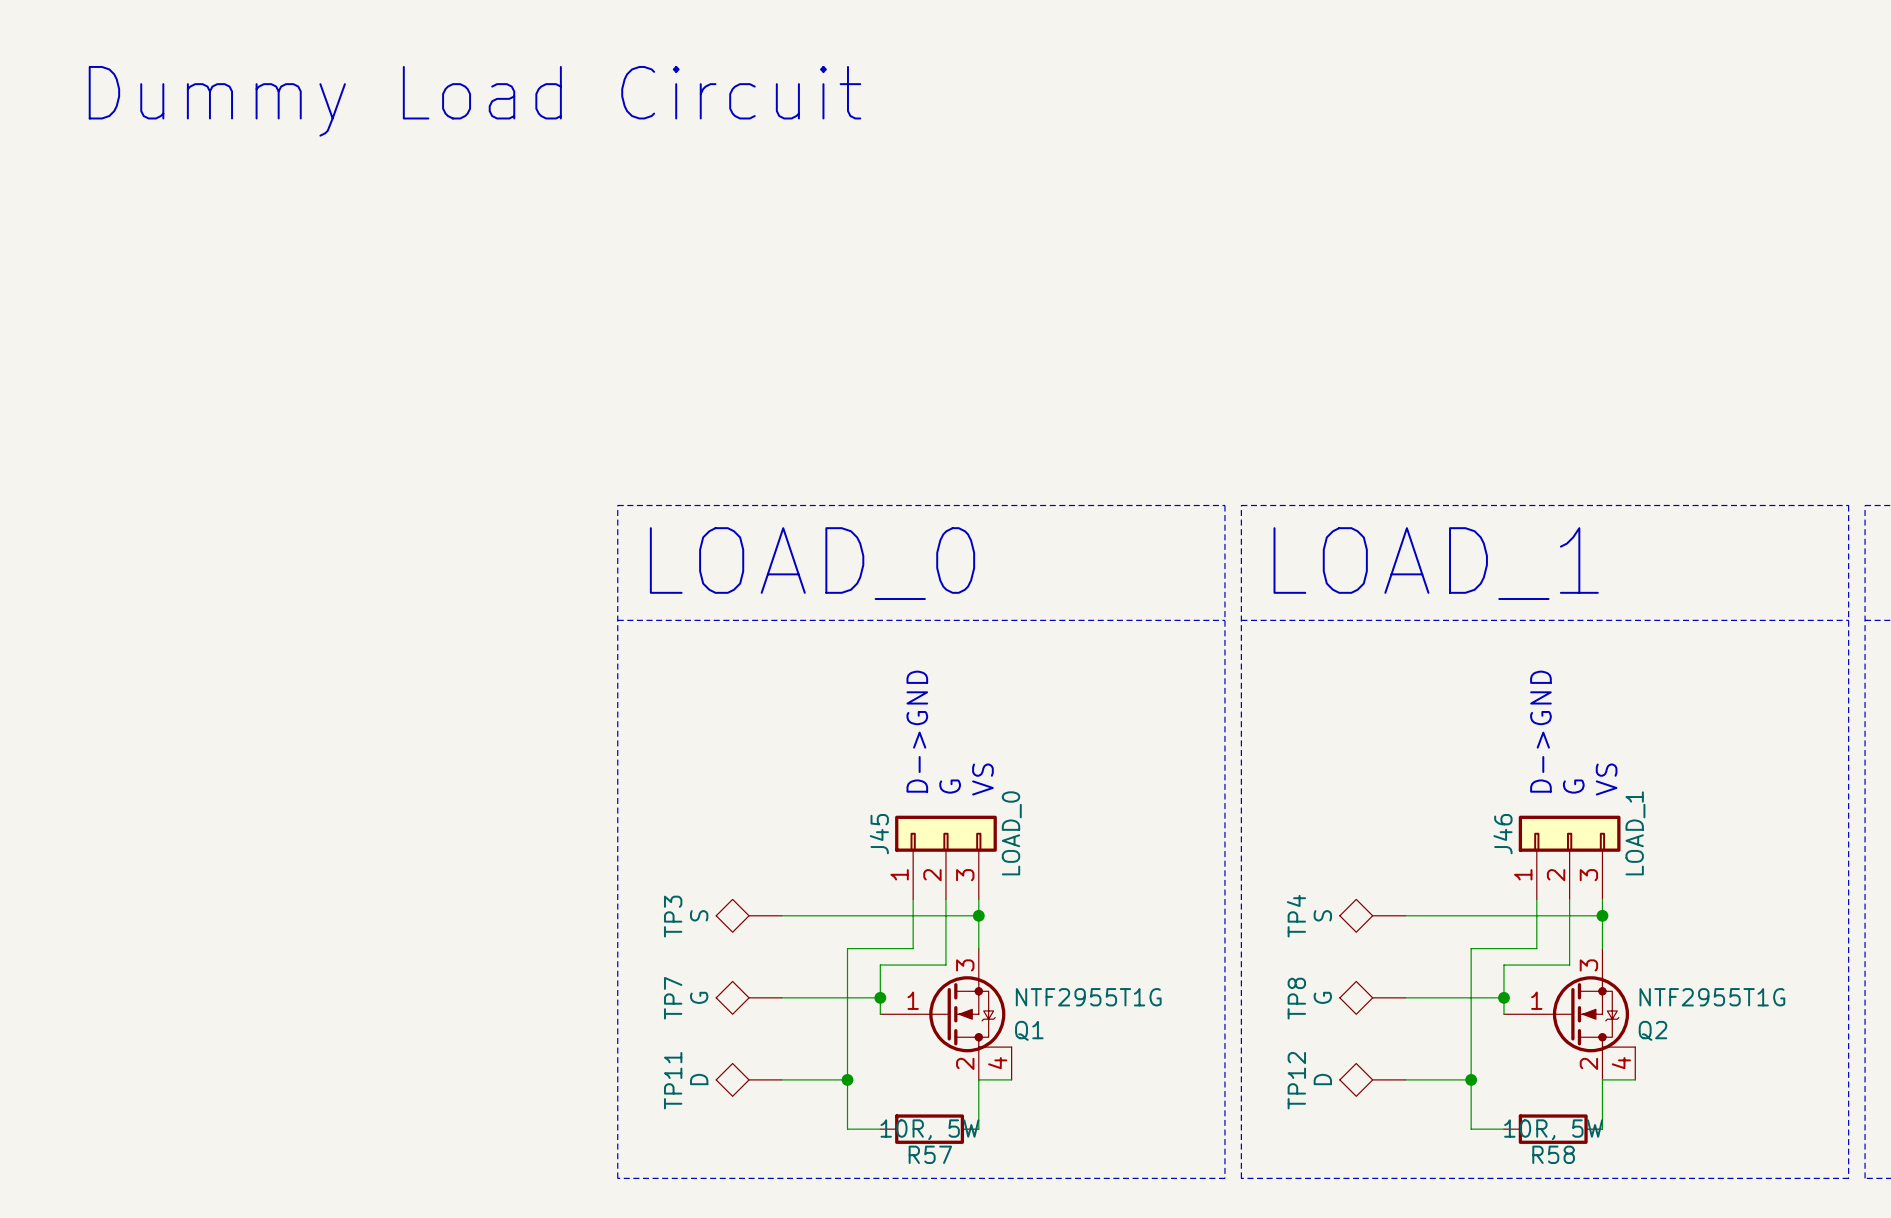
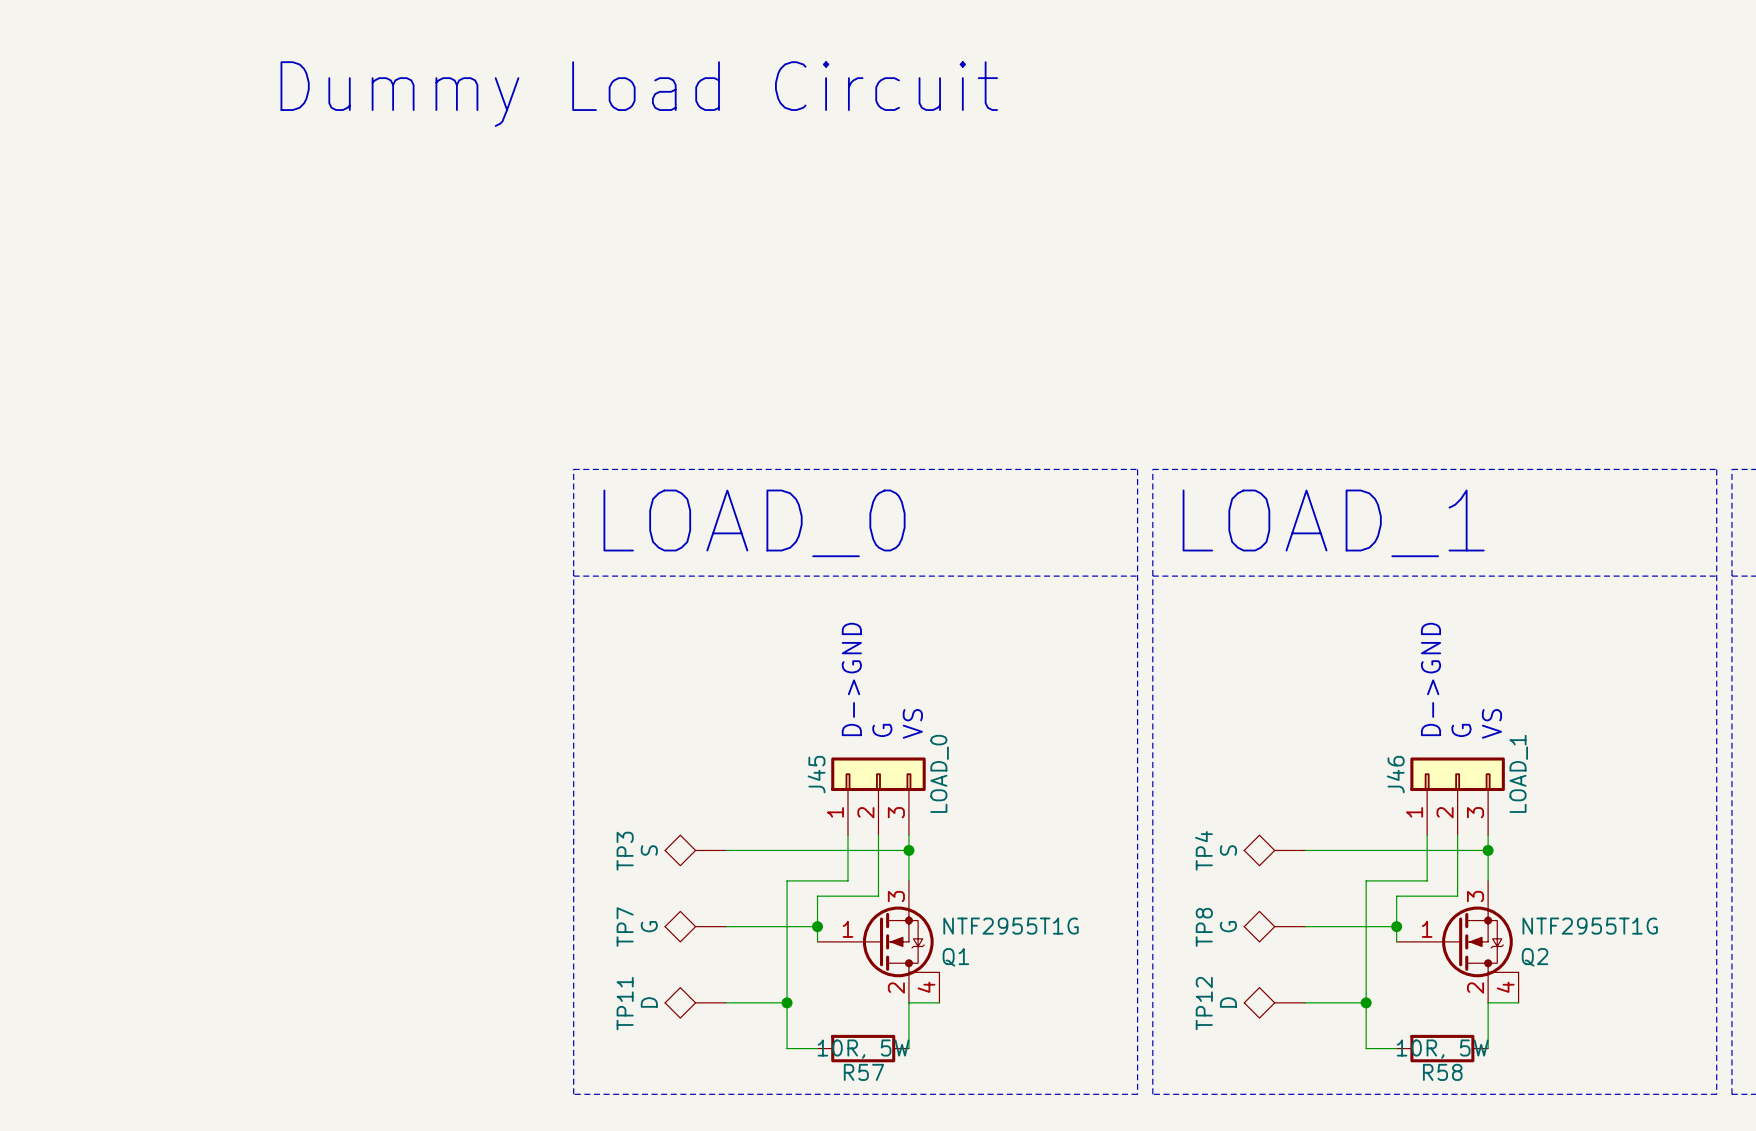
text position: Dummy Load Circuit (474, 101) -> Dummy Load Circuit (639, 94)

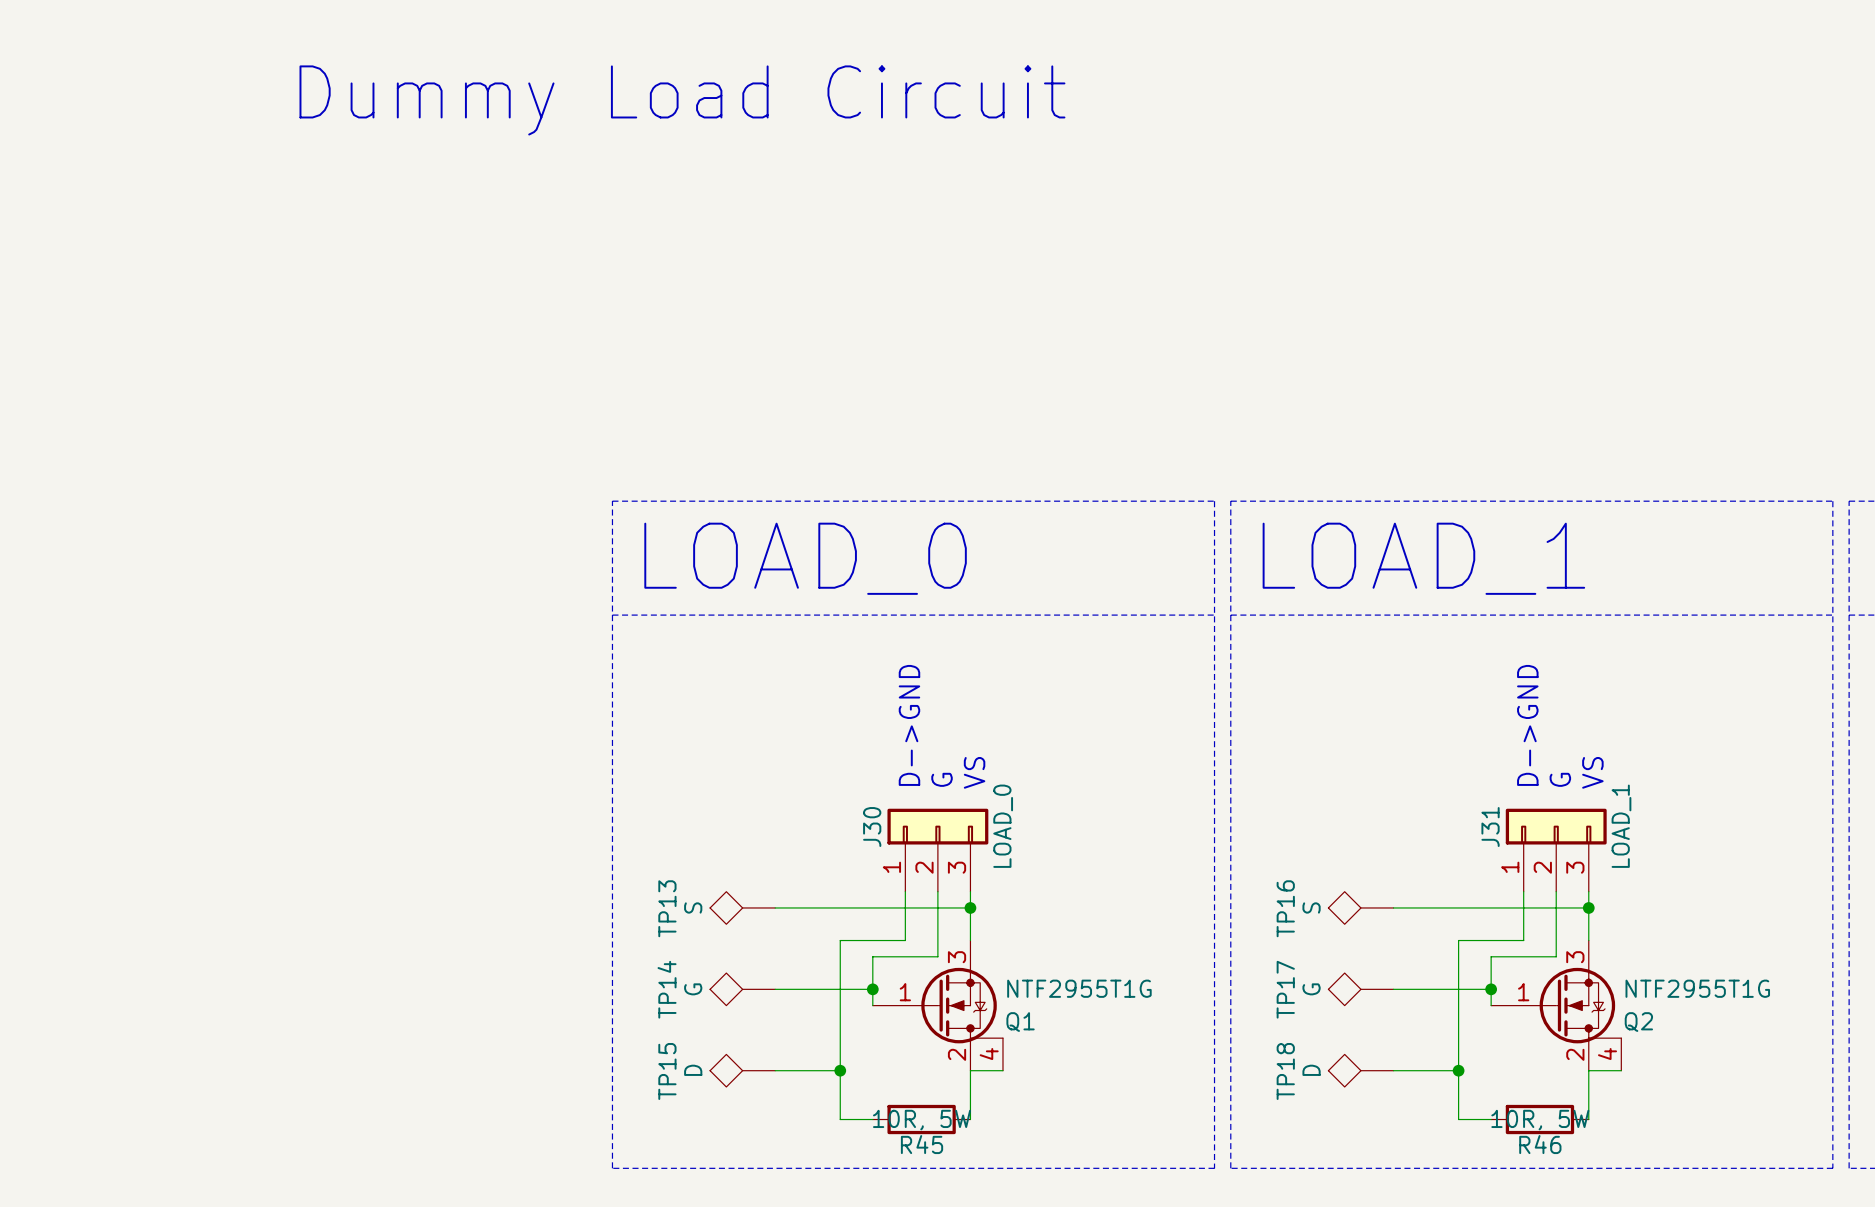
J45 name: J45 (816, 774) -> J30 (872, 827)
J46 name: J46 (1395, 774) -> J31 (1490, 827)
TP4 name: TP4 (1203, 850) -> TP16 (1285, 908)
TP3 name: TP3 (625, 851) -> TP13 (667, 908)
TP7 name: TP7 (625, 927) -> TP14 (667, 989)
TP8 name: TP8 (1204, 927) -> TP17 (1285, 989)
TP11 name: TP11 (625, 1003) -> TP15 (667, 1071)
TP12 name: TP12 (1204, 1003) -> TP18 (1285, 1071)
R57 name: R57 (863, 1072) -> R45 (922, 1144)
R58 name: R58 (1442, 1072) -> R46 (1540, 1144)

